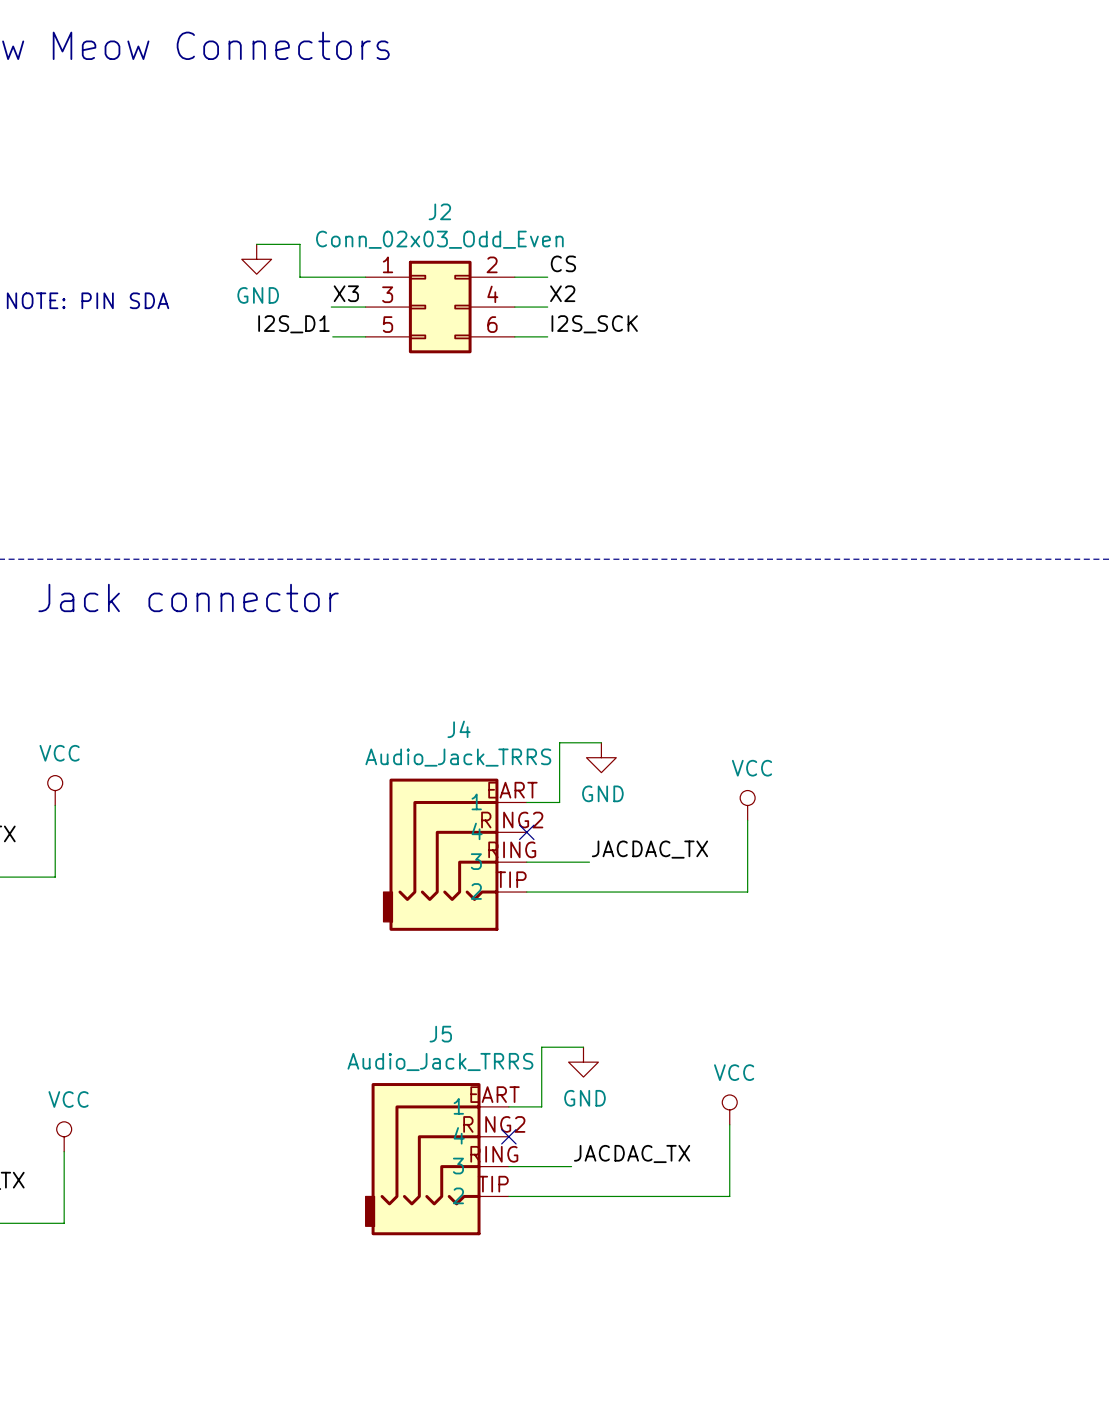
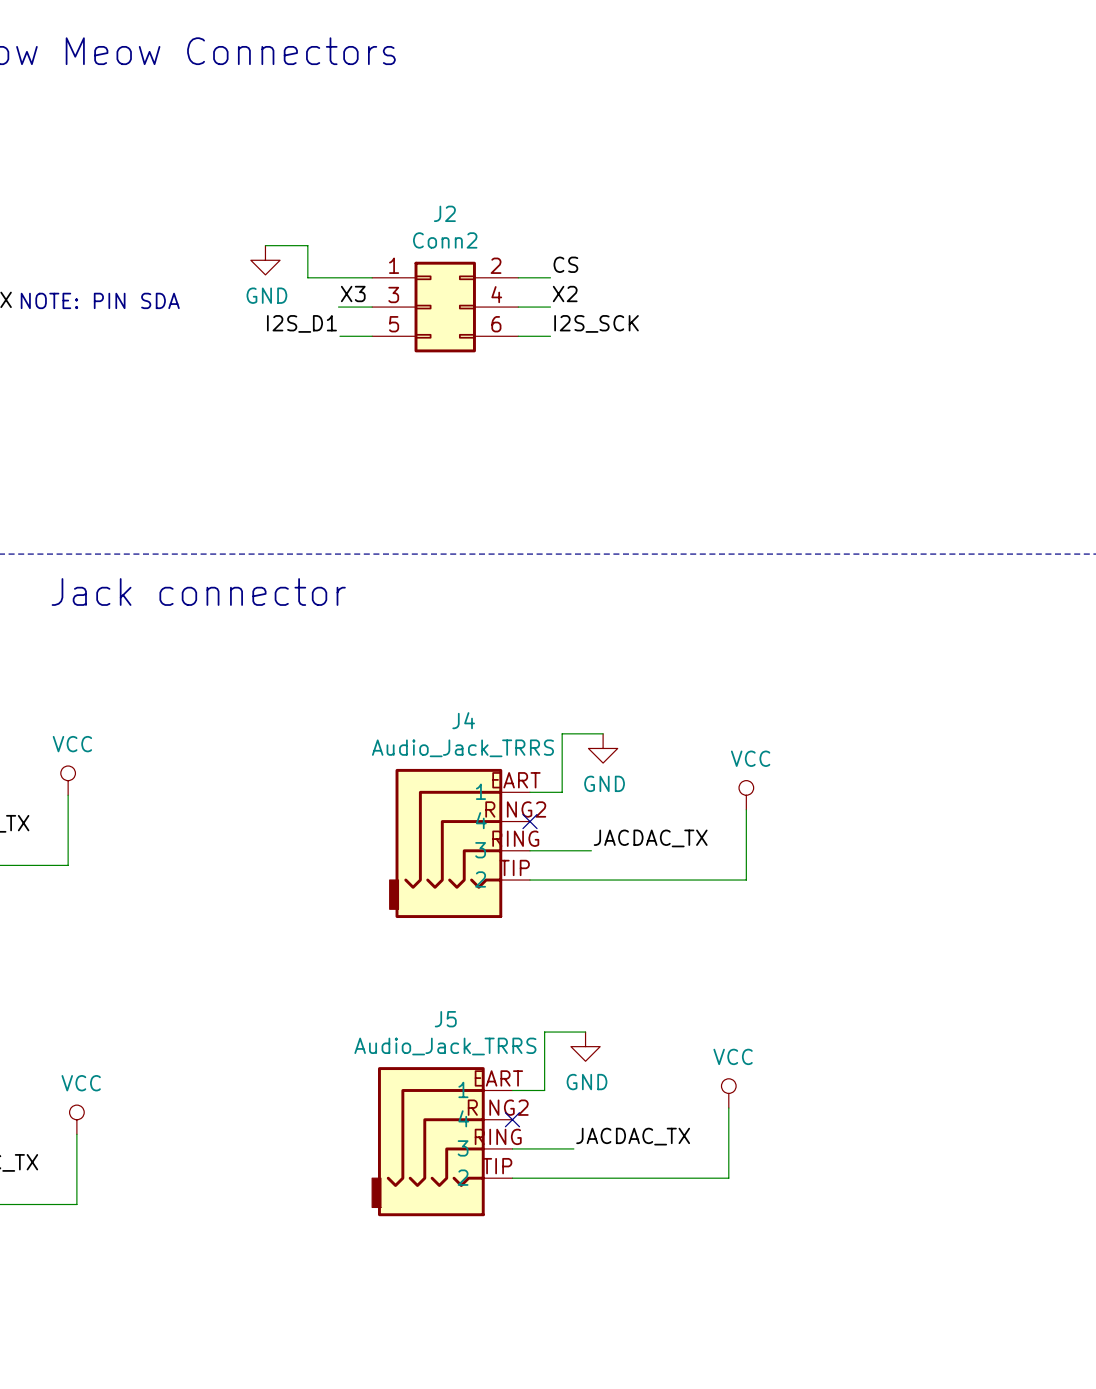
J2 value: Conn_02x03_Odd_Even (439, 239) -> Conn2 (445, 240)

